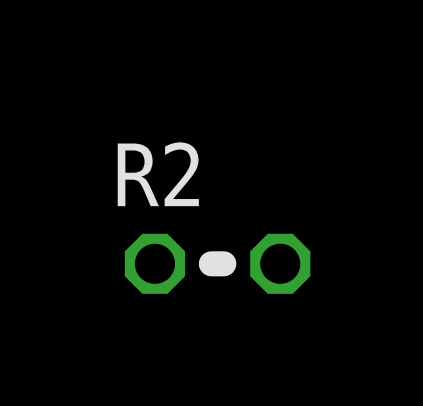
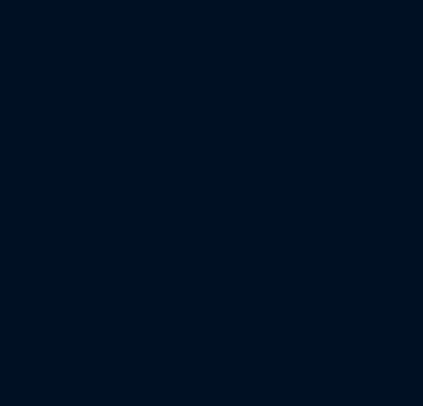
R2: (217, 263) -> none

